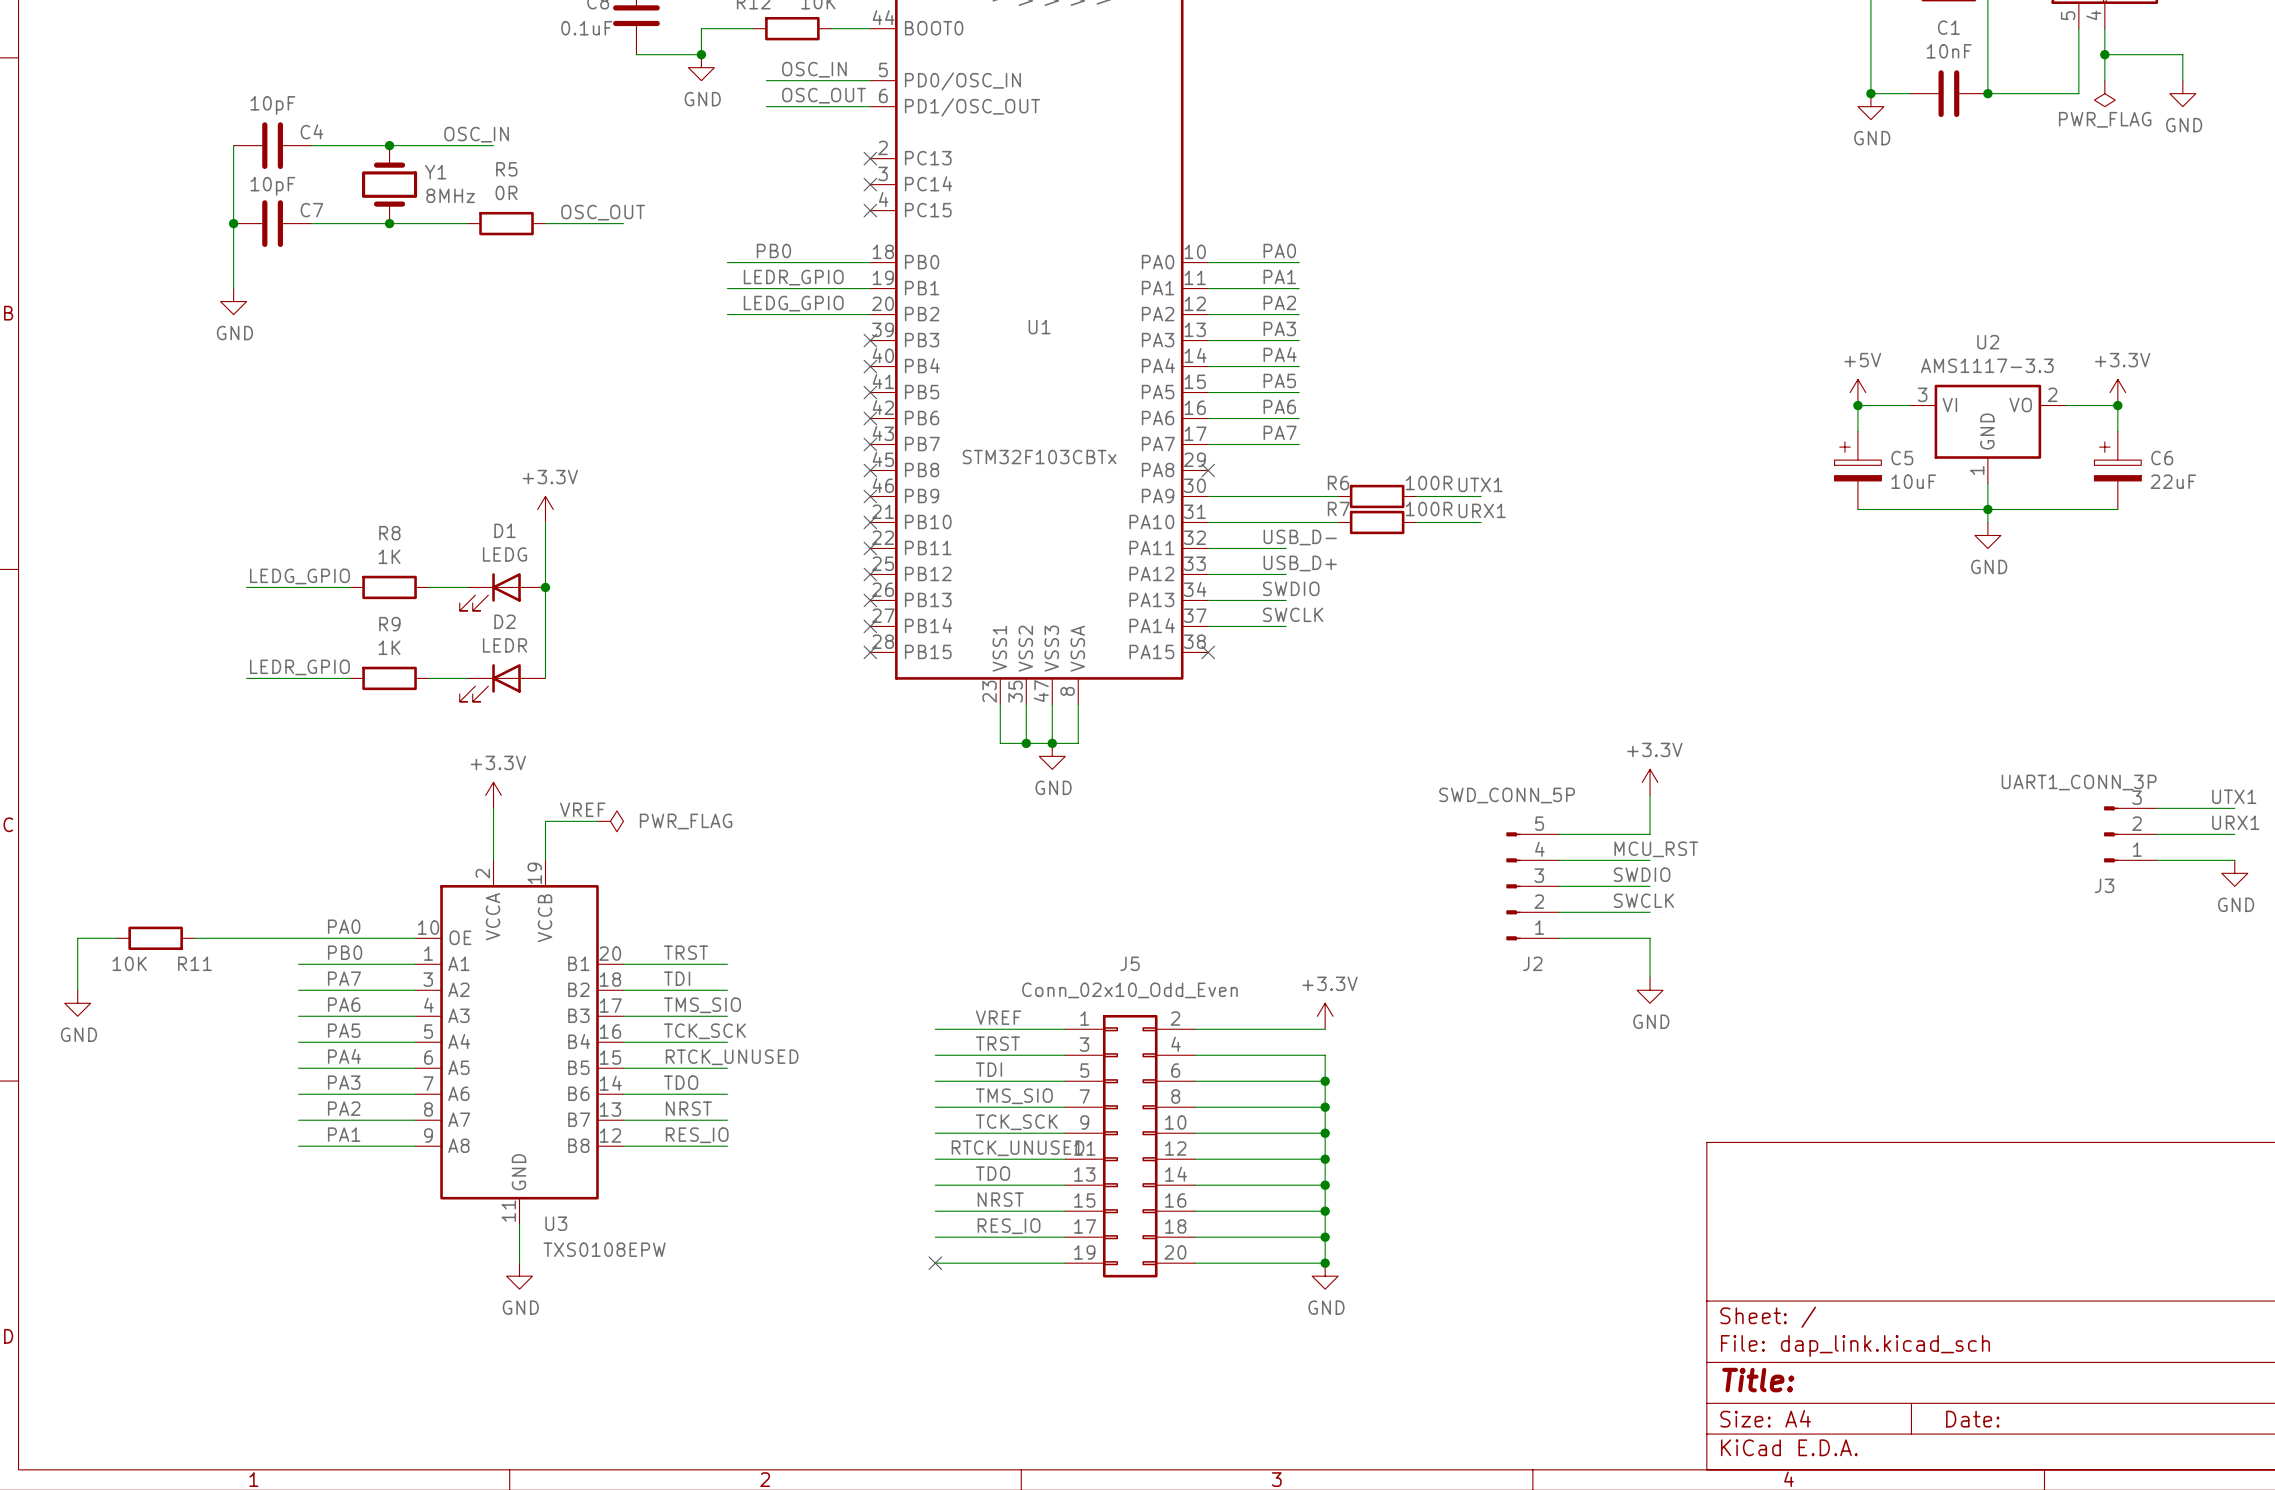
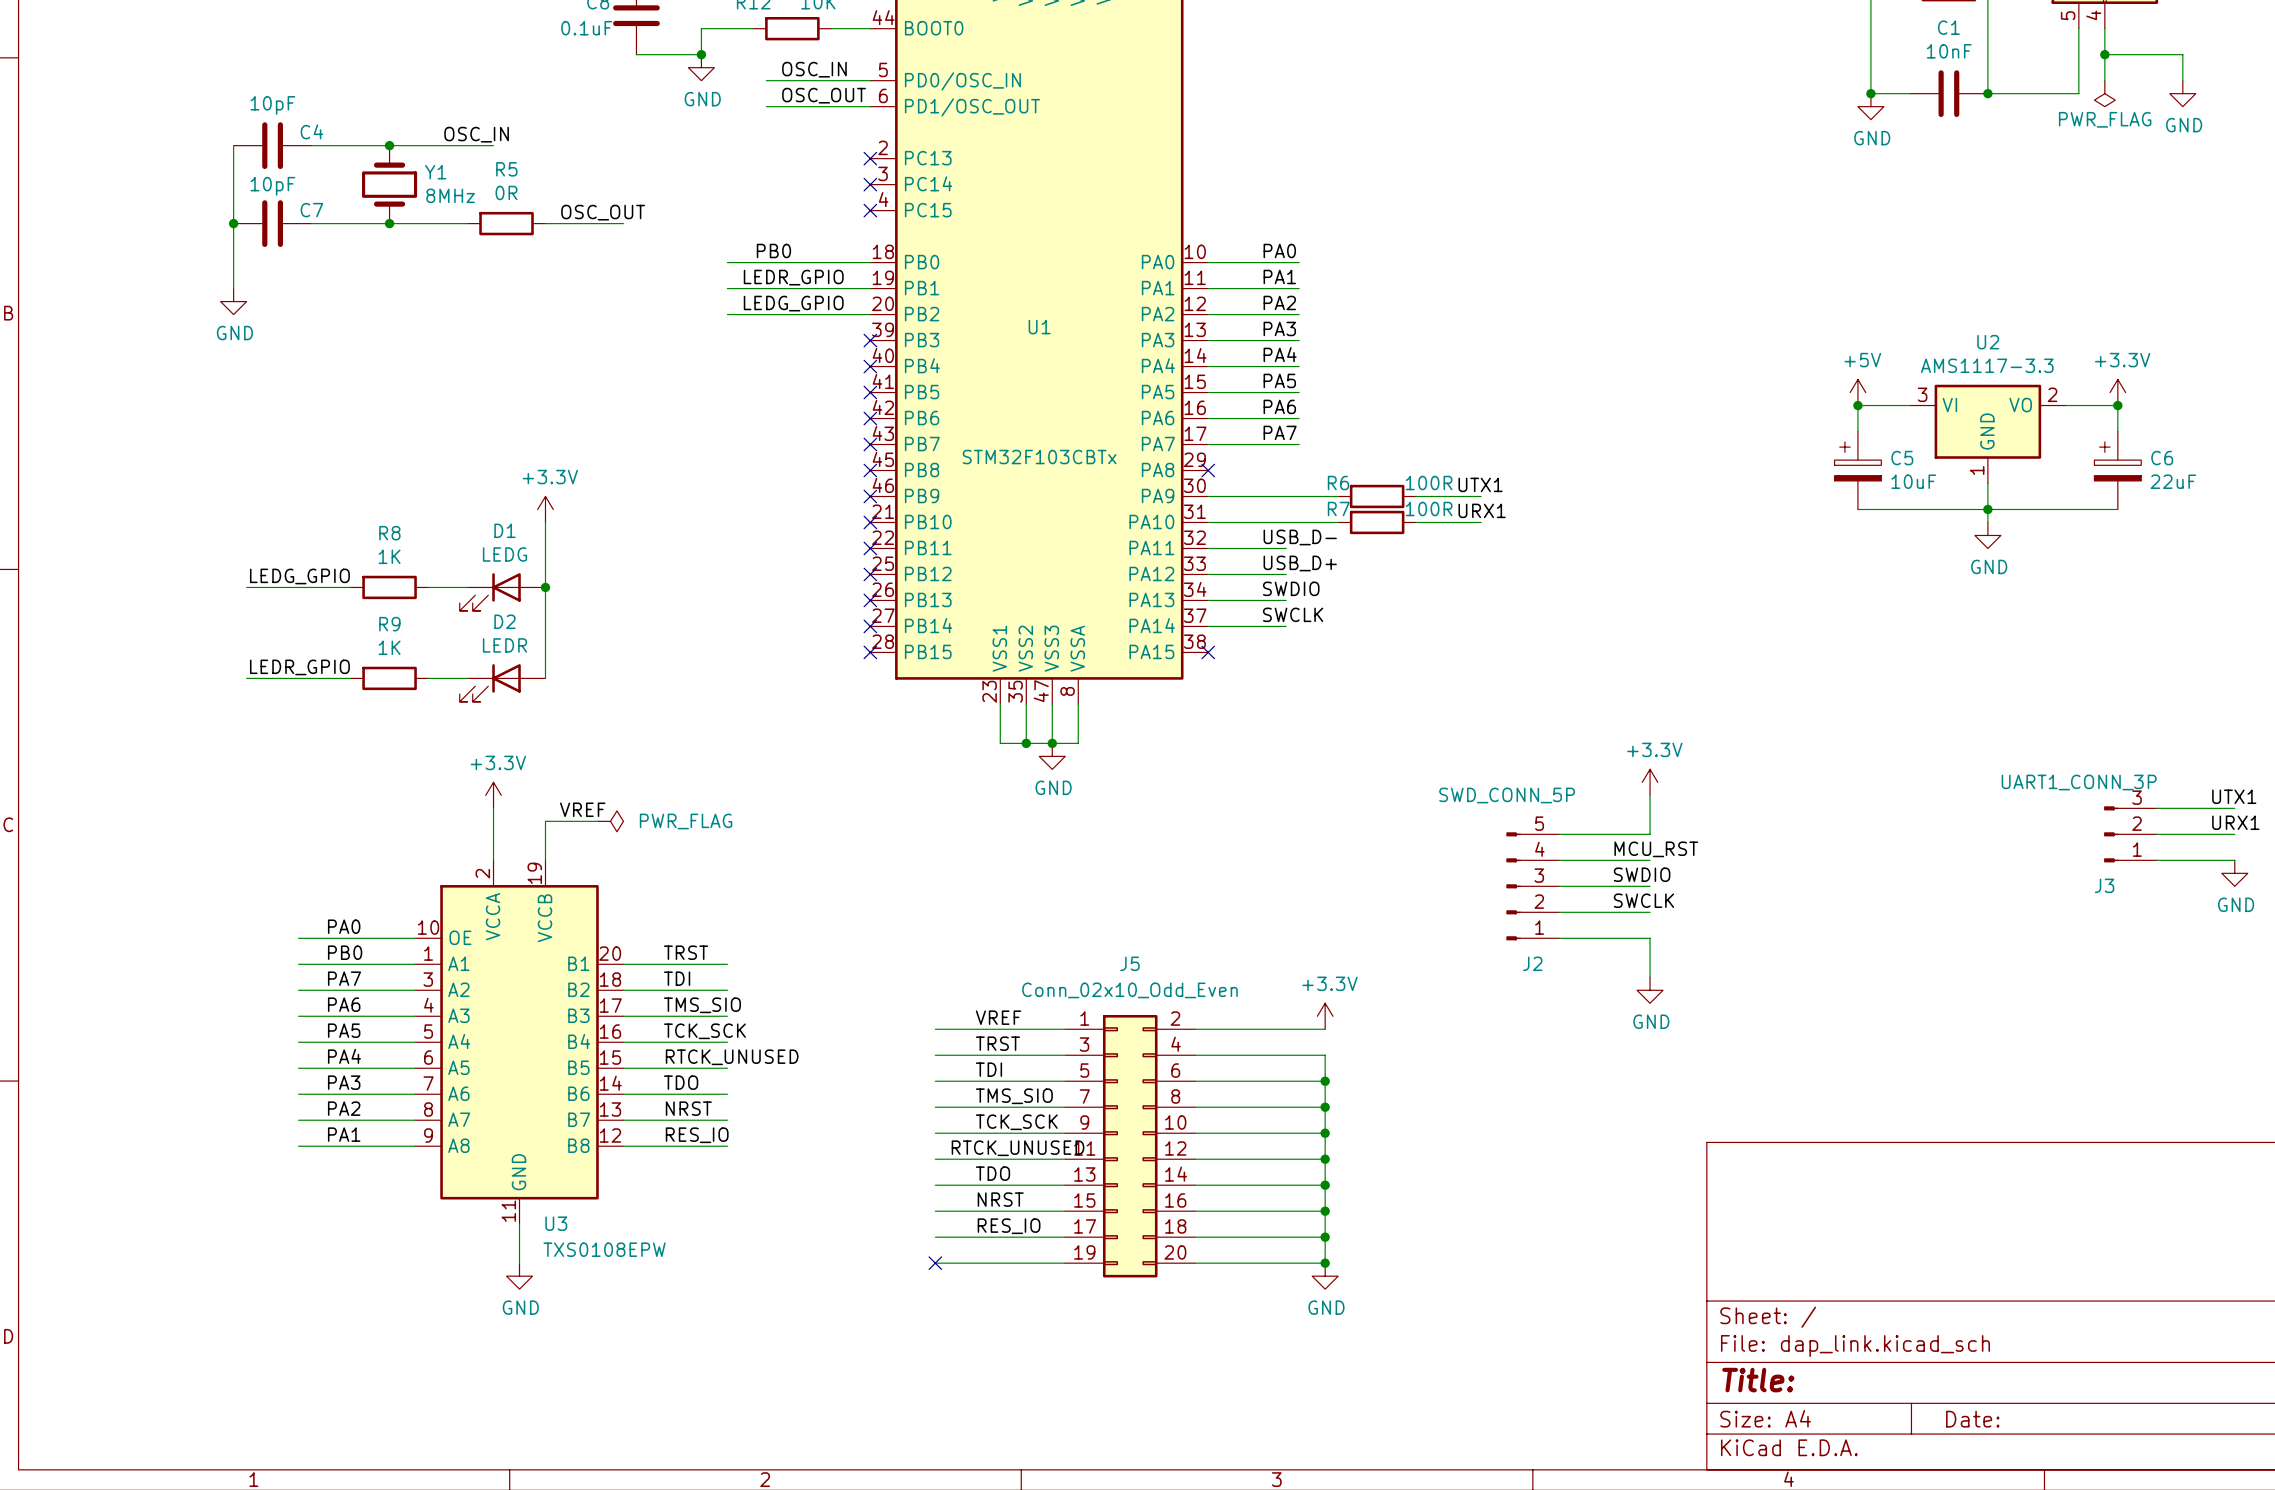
wire: (116, 938) (77, 938) (77, 990) -> none
R11: 10K (155, 938) -> none
wire: (194, 938) (298, 938) -> none
power symbol: GND (77, 1003) -> none

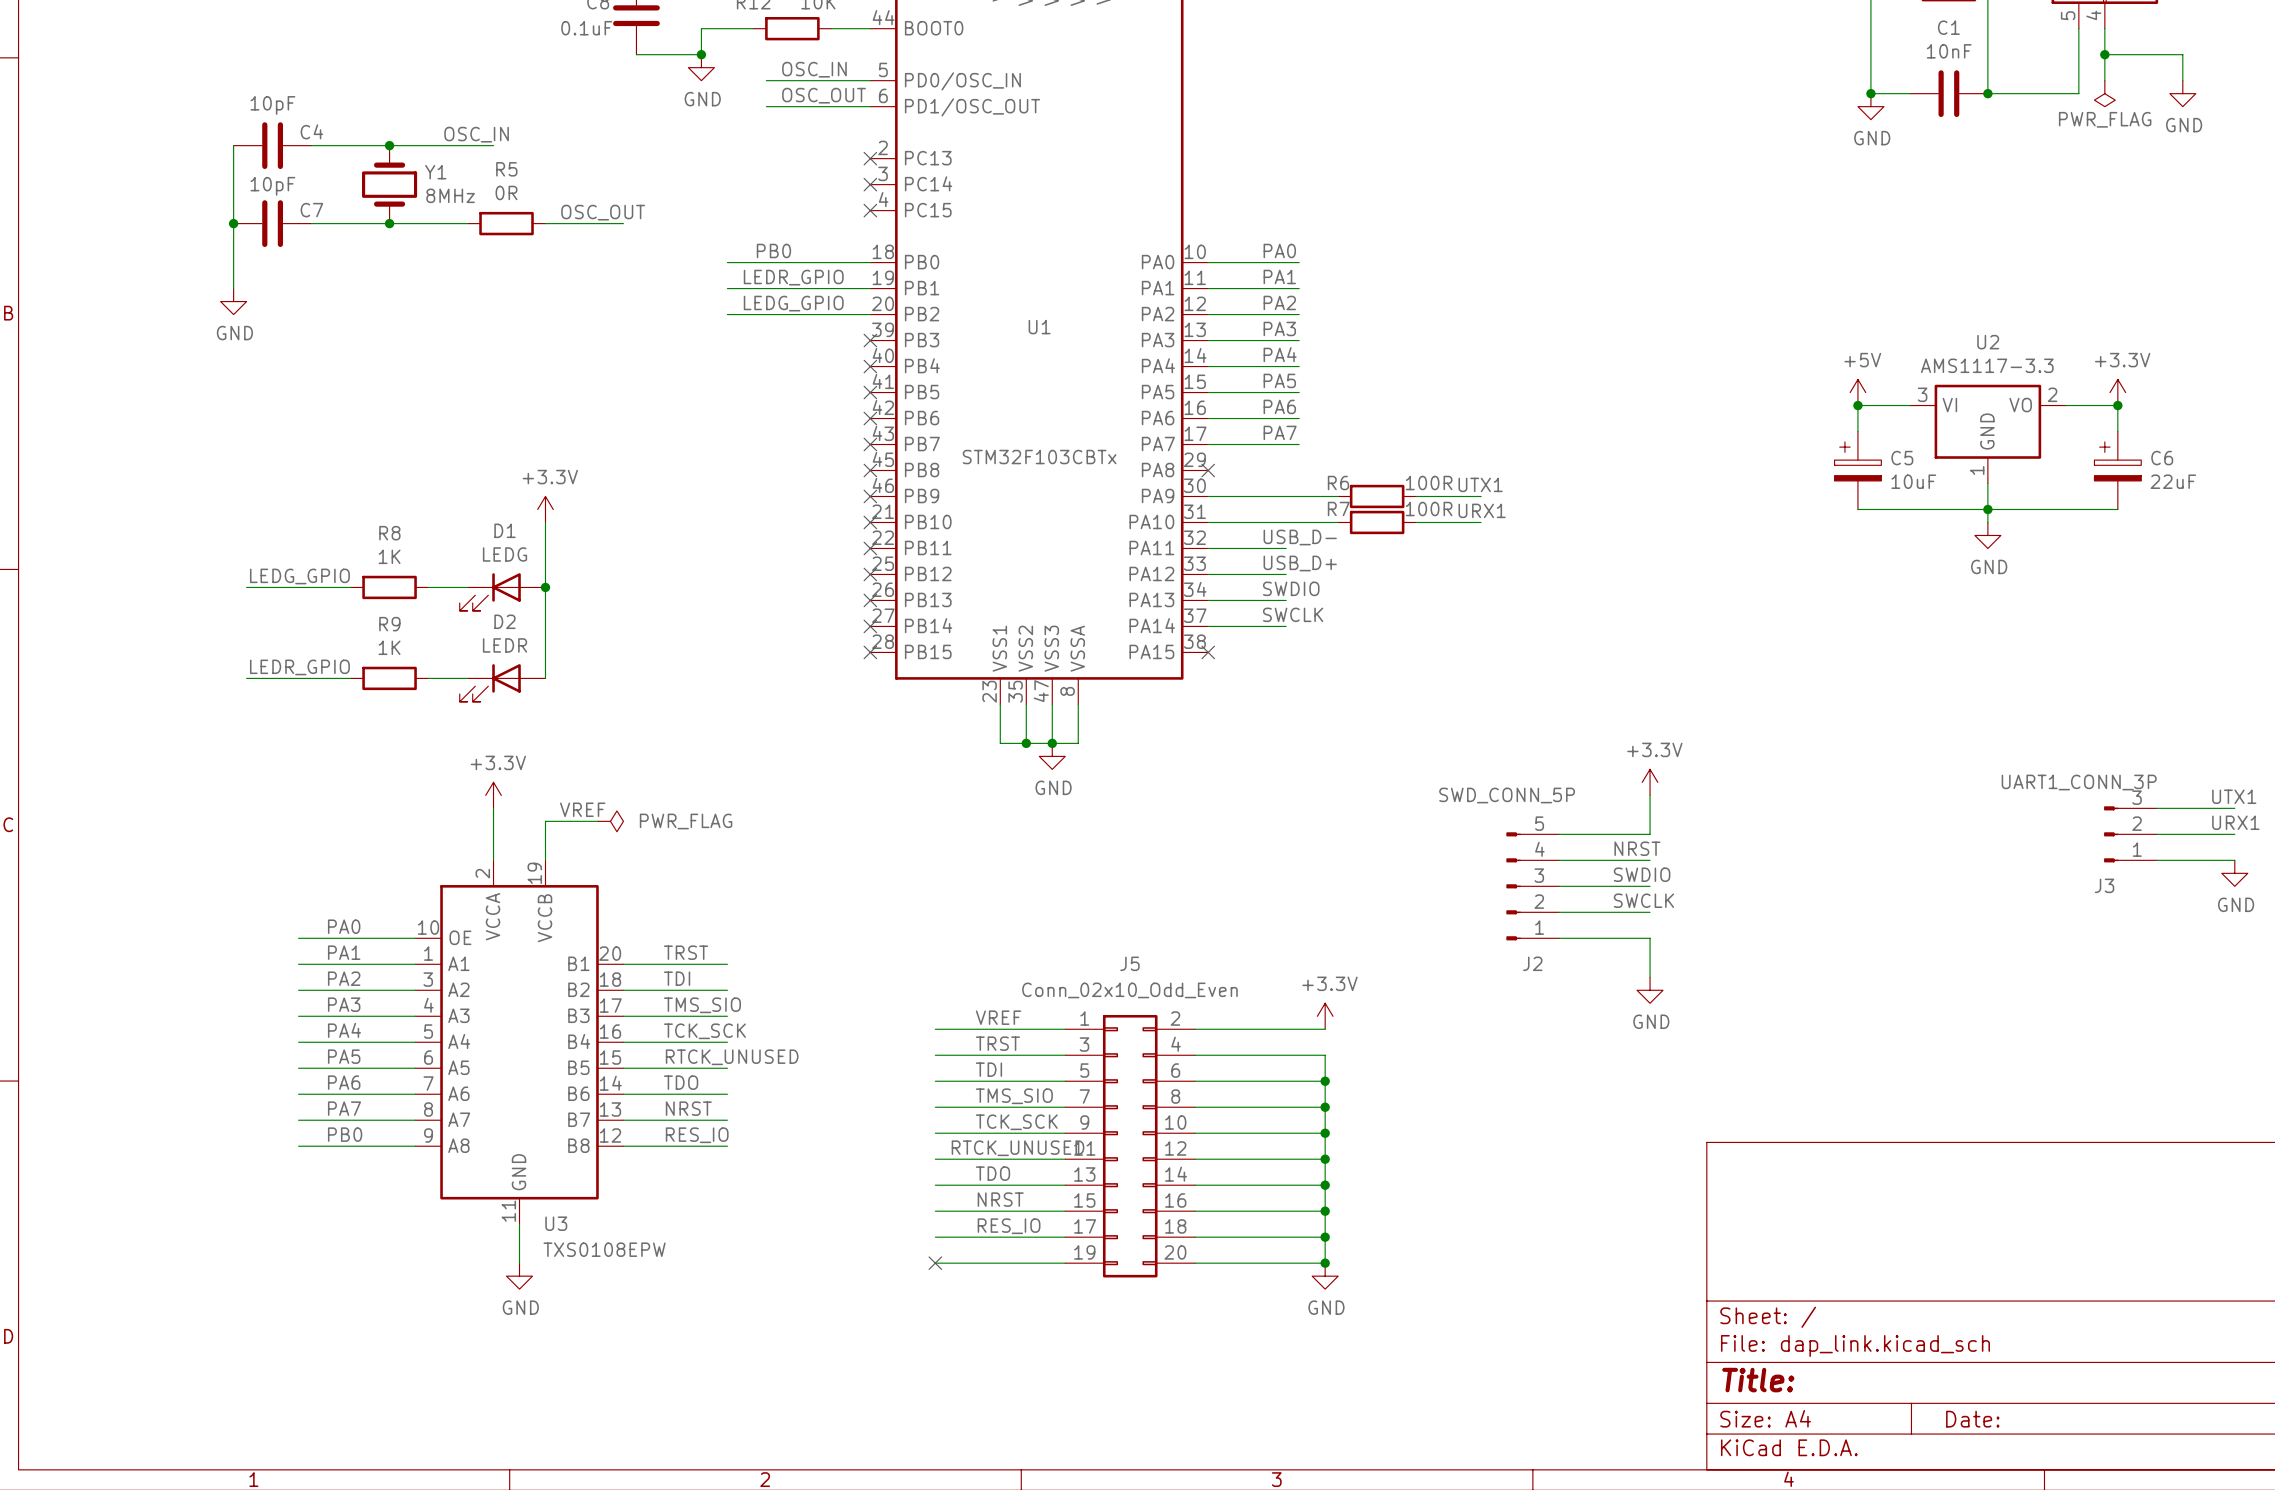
label: MCU_RST (1656, 849) -> NRST (1637, 848)
label: PB0 (345, 952) -> PA1 (344, 952)
label: PA7 (344, 978) -> PA2 (344, 978)
label: PA6 (344, 1004) -> PA3 (344, 1004)
label: PA5 (344, 1030) -> PA4 (344, 1030)
label: PA4 (344, 1056) -> PA5 (344, 1056)
label: PA3 (344, 1082) -> PA6 (344, 1082)
label: PA2 (344, 1108) -> PA7 (344, 1108)
label: PA1 (344, 1134) -> PB0 (345, 1134)

